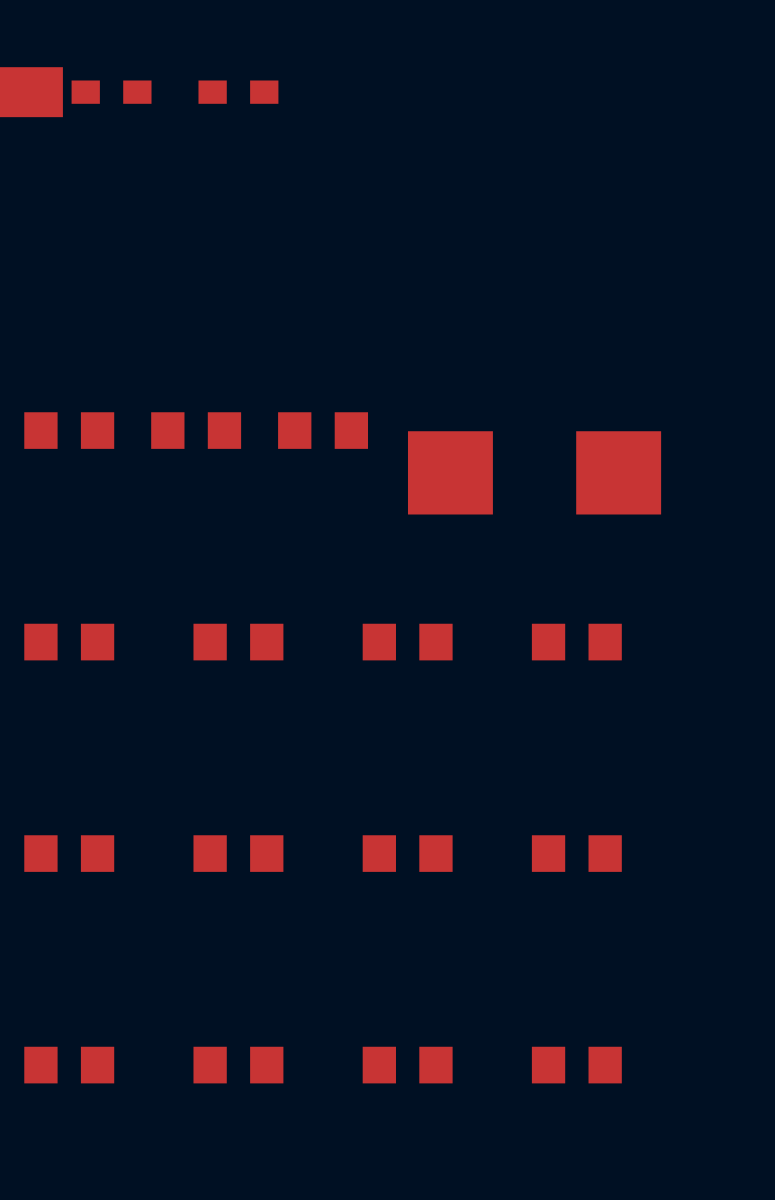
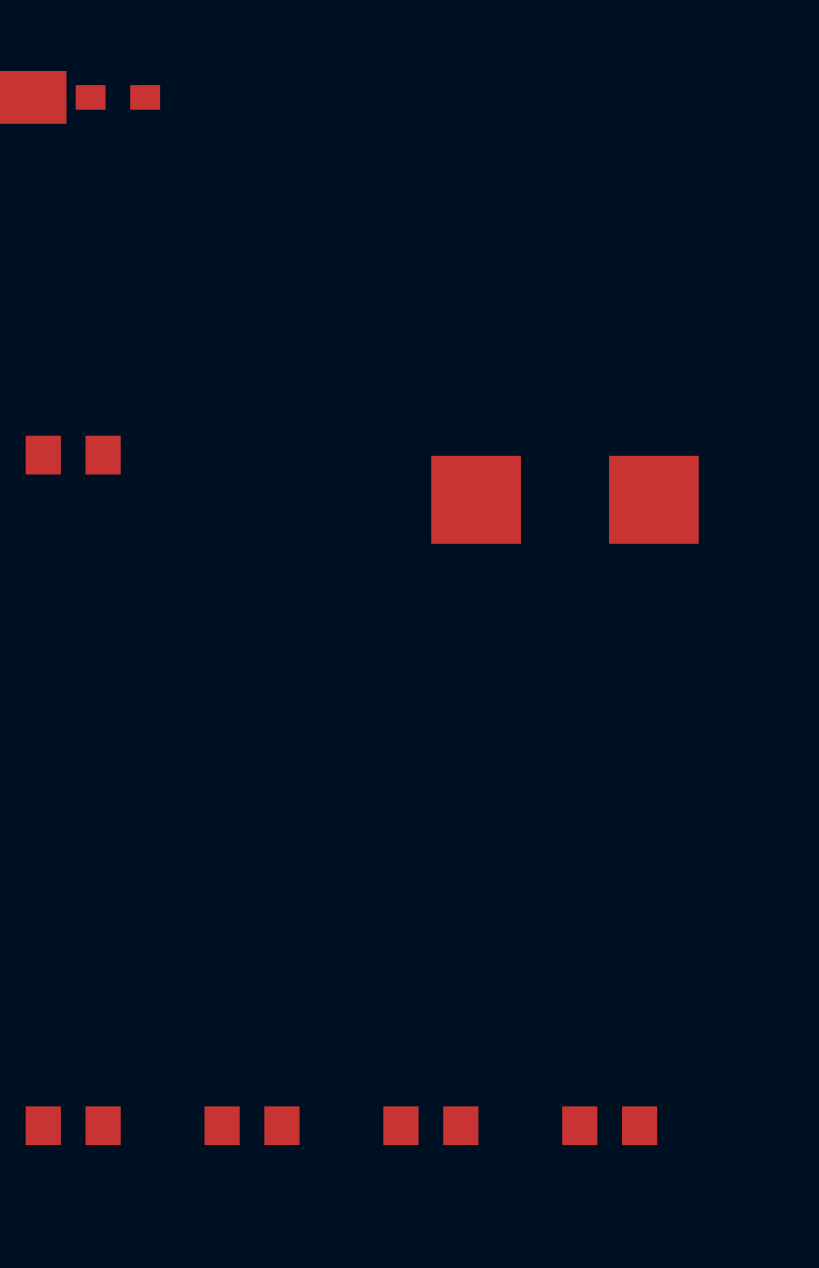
part: (238, 92) -> none
part: (196, 430) -> none
part: (323, 430) -> none
part: (69, 642) -> none
part: (238, 642) -> none
part: (407, 642) -> none
part: (576, 642) -> none
part: (69, 853) -> none
part: (238, 853) -> none
part: (407, 853) -> none
part: (576, 853) -> none

